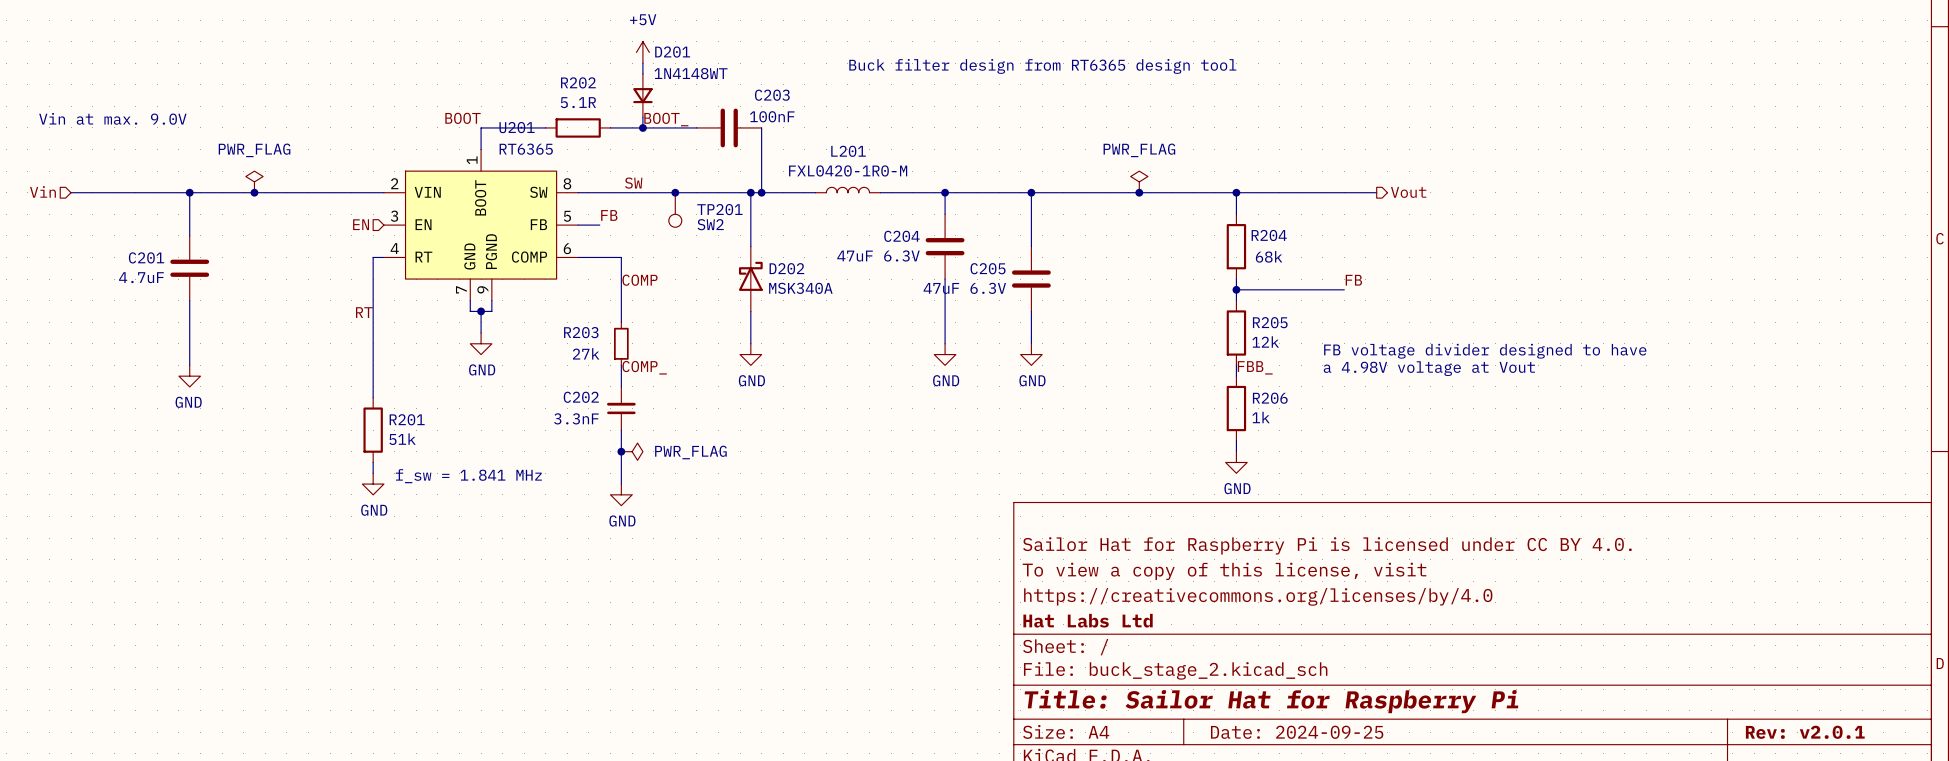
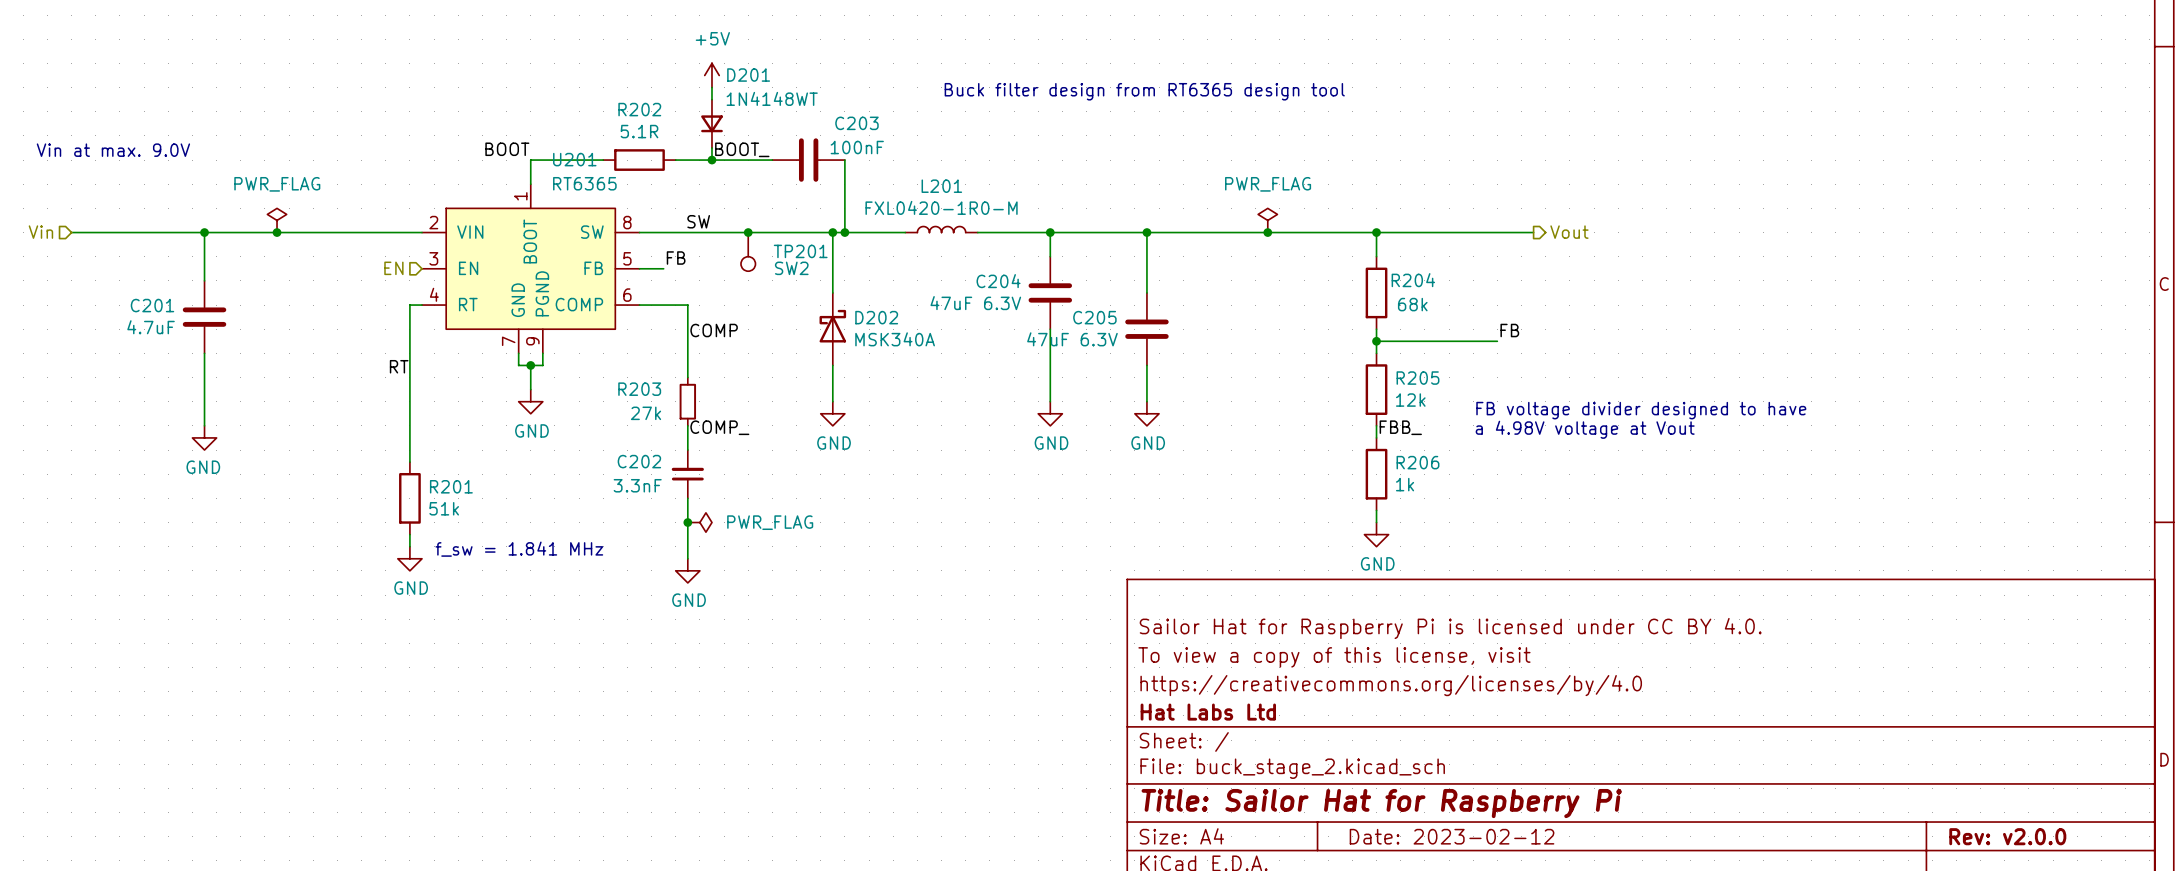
title block: Date: 2024-09-25 (1297, 732) -> Date: 2023-02-12 (1452, 836)
title block: Rev: v2.0.1 (1805, 732) -> Rev: v2.0.0 (2007, 836)

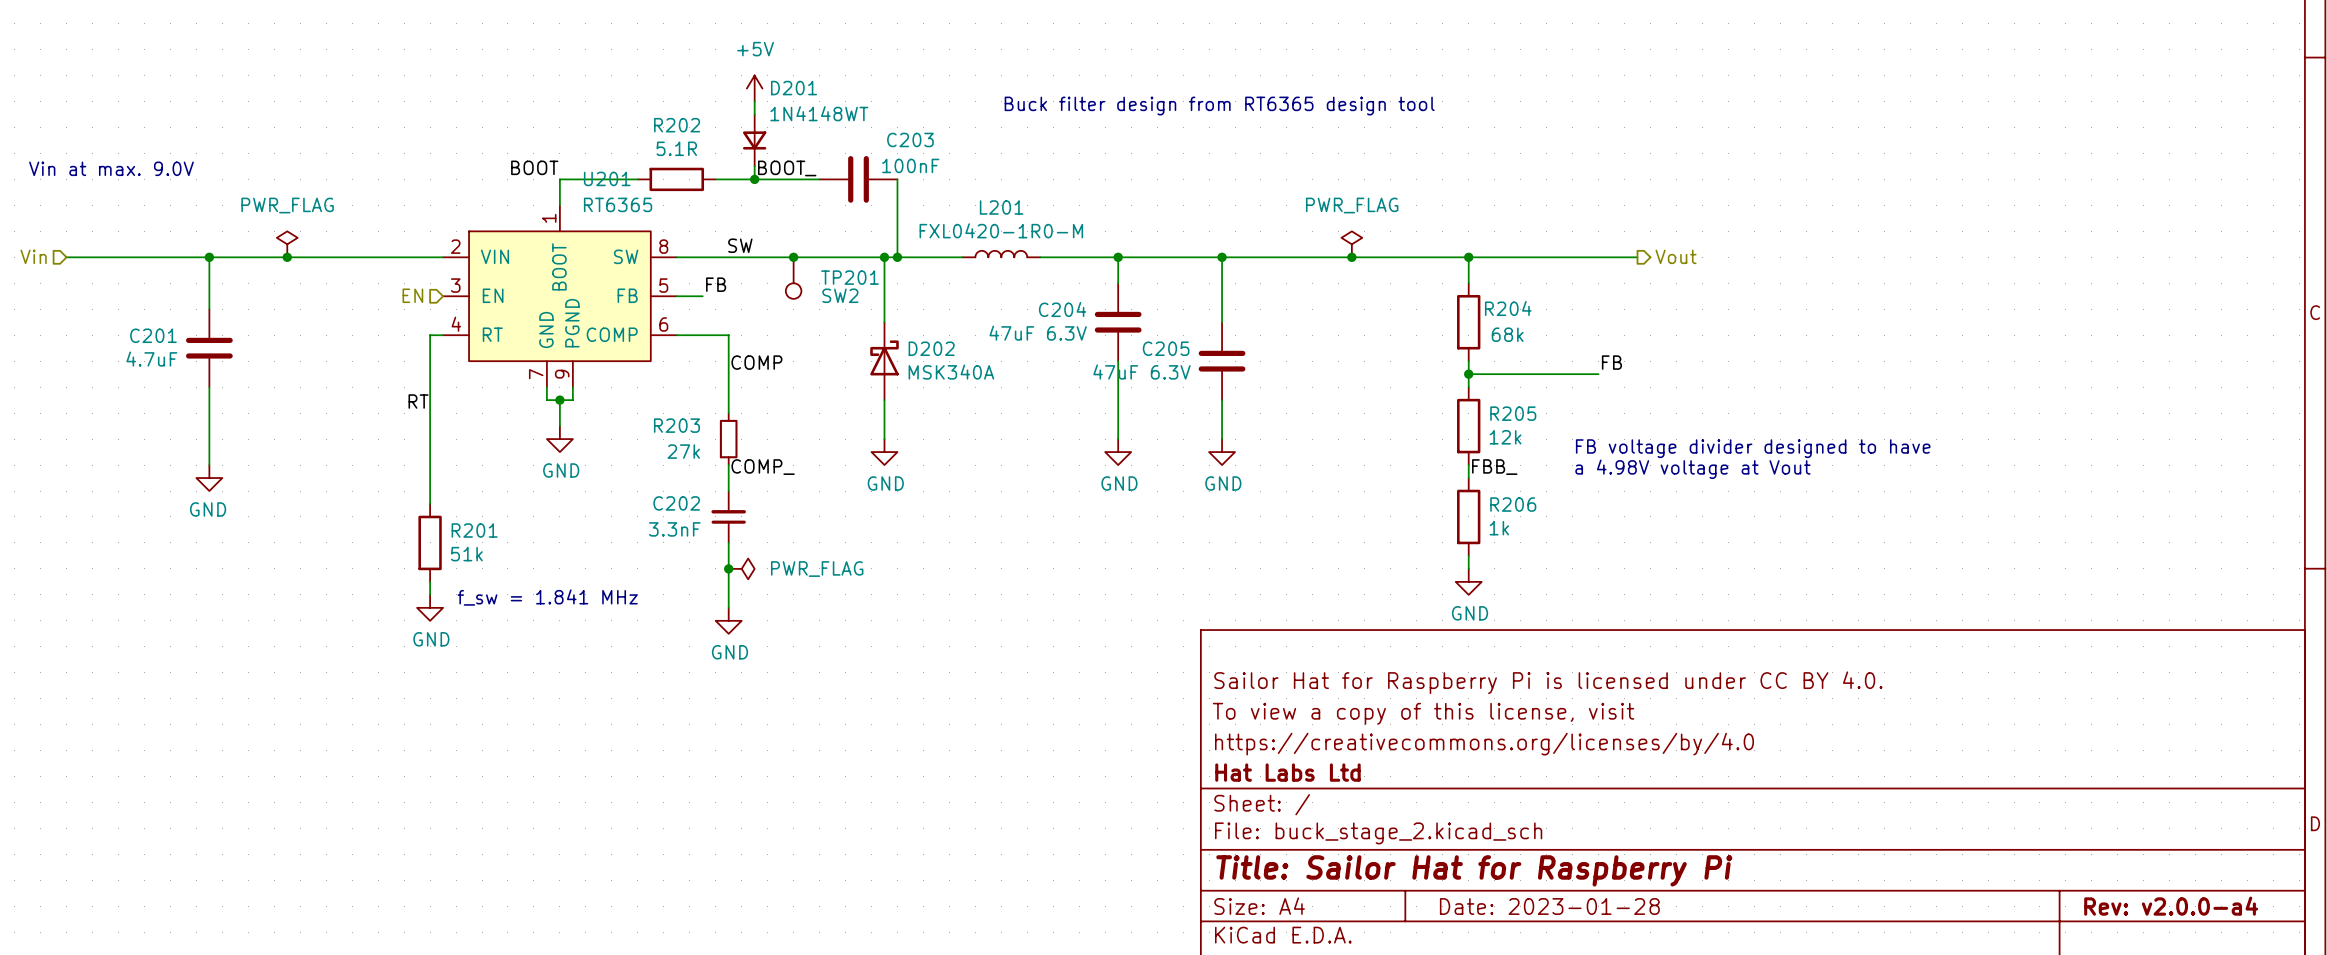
title block: Date: 2023-02-12 (1452, 836) -> Date: 2023-01-28 (1549, 906)
title block: Rev: v2.0.0 (2007, 836) -> Rev: v2.0.0-a4 (2171, 906)

